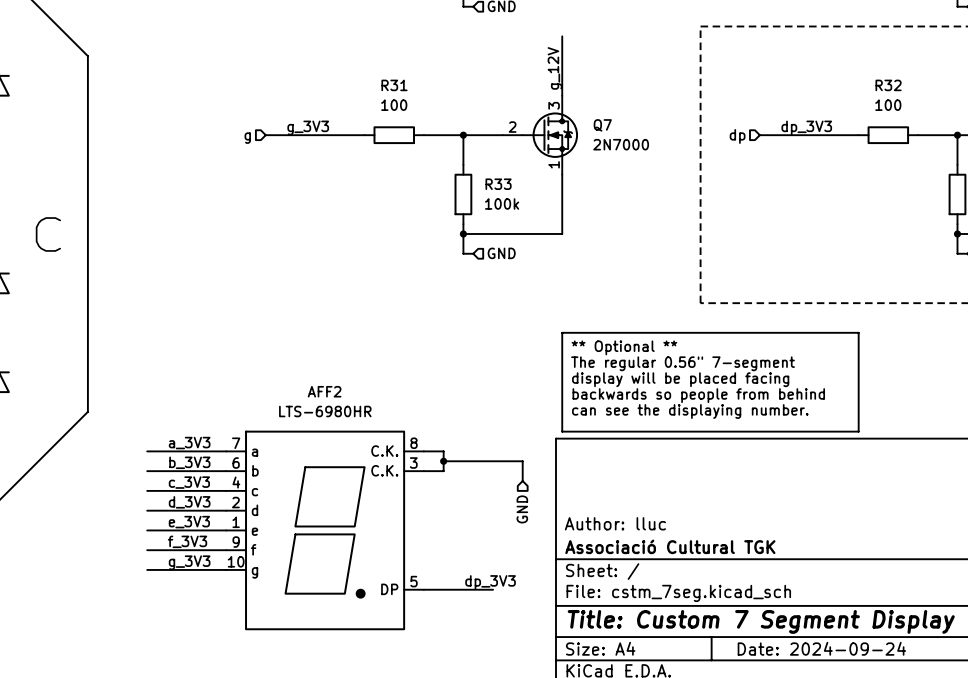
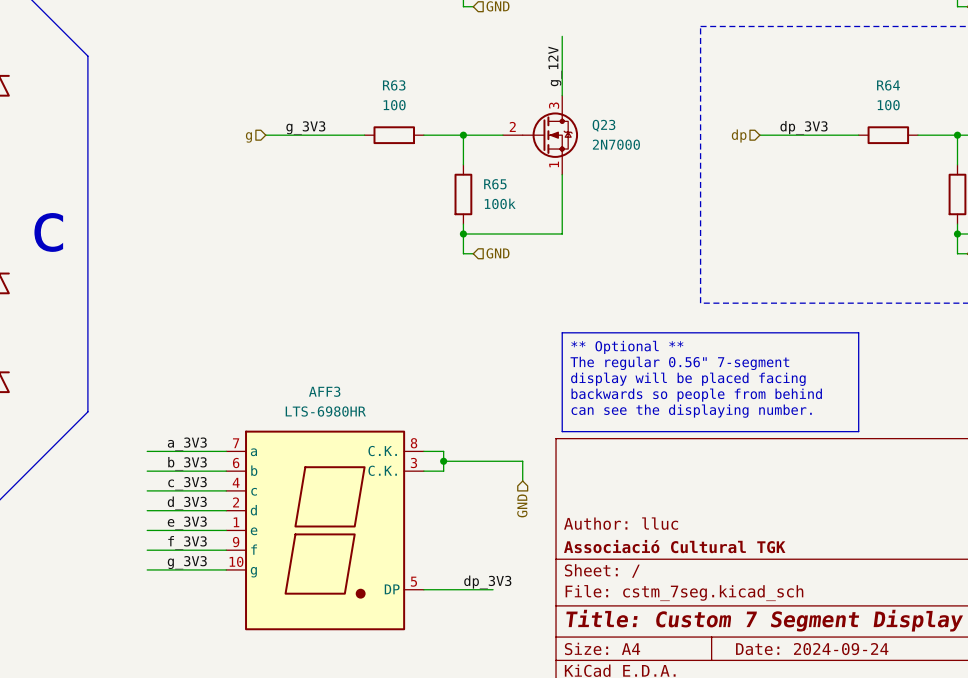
R31 name: R31 (394, 85) -> R63 (394, 85)
R32 name: R32 (888, 85) -> R64 (888, 85)
Q7 name: Q7 (602, 125) -> Q23 (604, 125)
R33 name: R33 (498, 184) -> R65 (495, 184)
AFF2 name: AFF2 (324, 391) -> AFF3 (324, 391)

